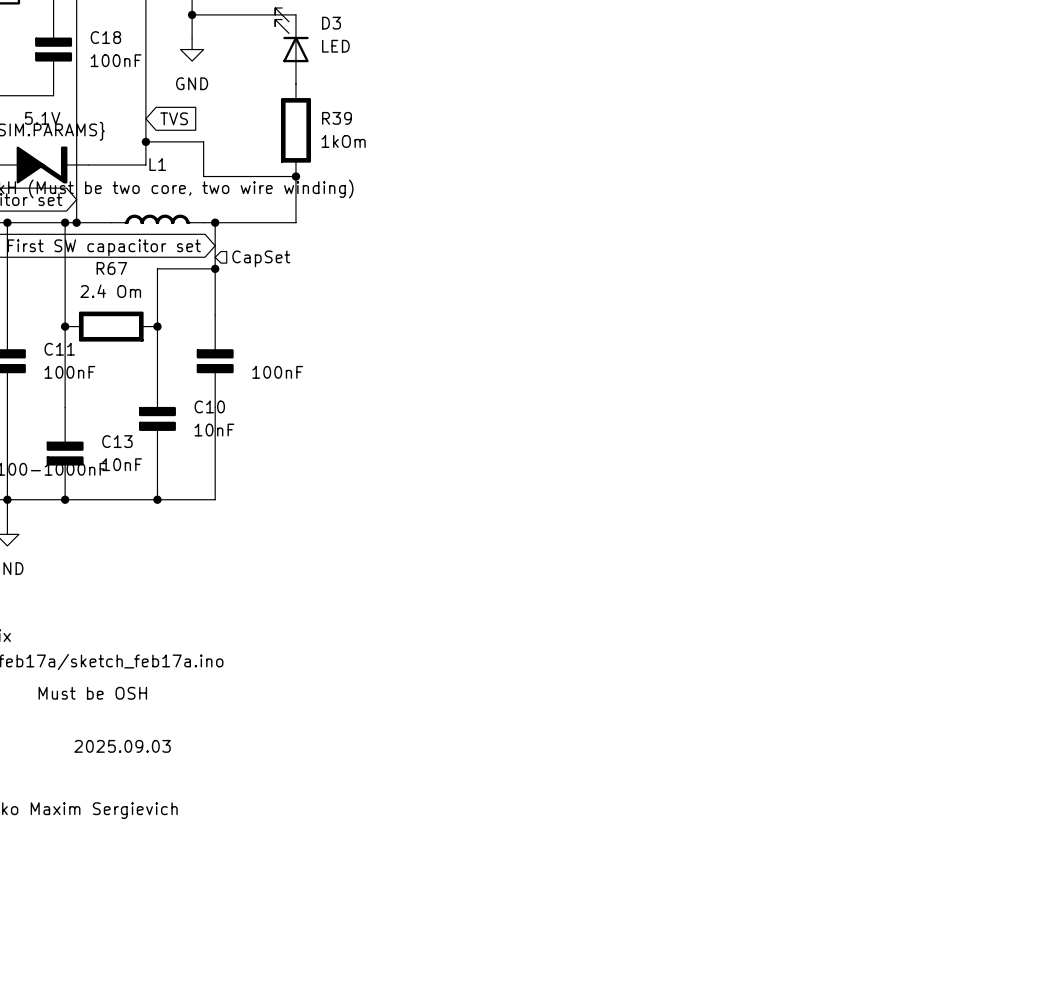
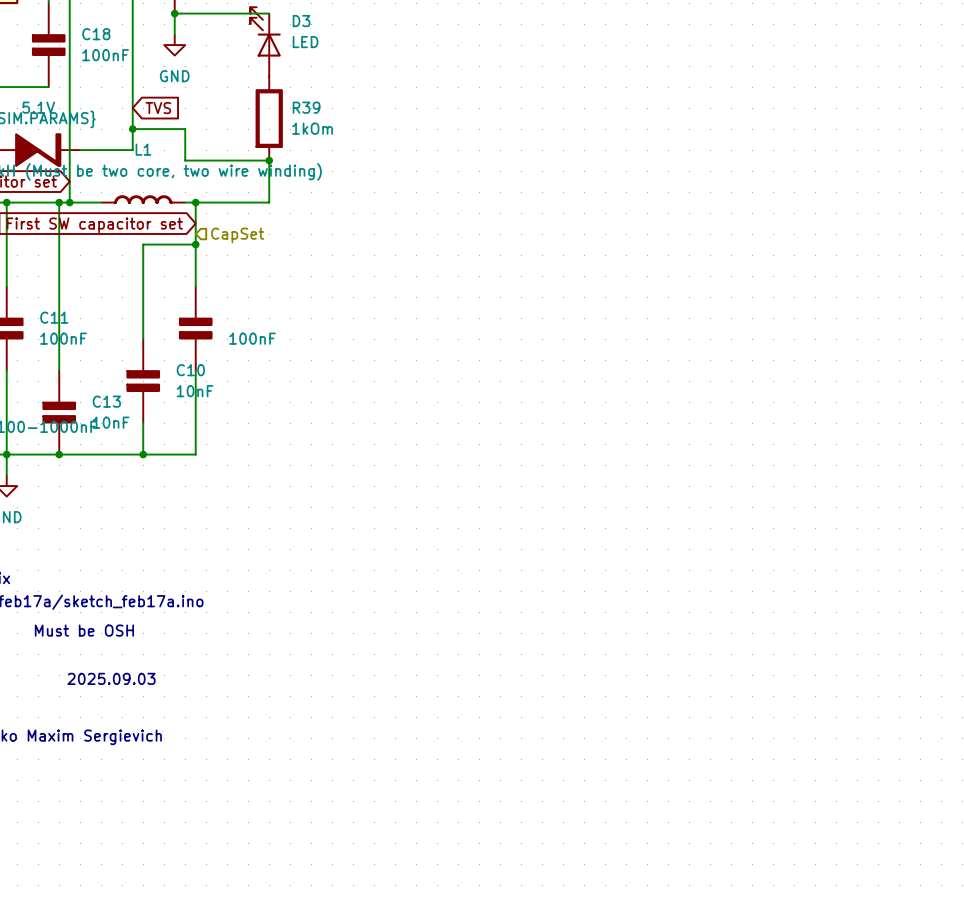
junction: (65, 326) -> none
R67: 2.4 Om (111, 326) -> none
junction: (157, 326) -> none

